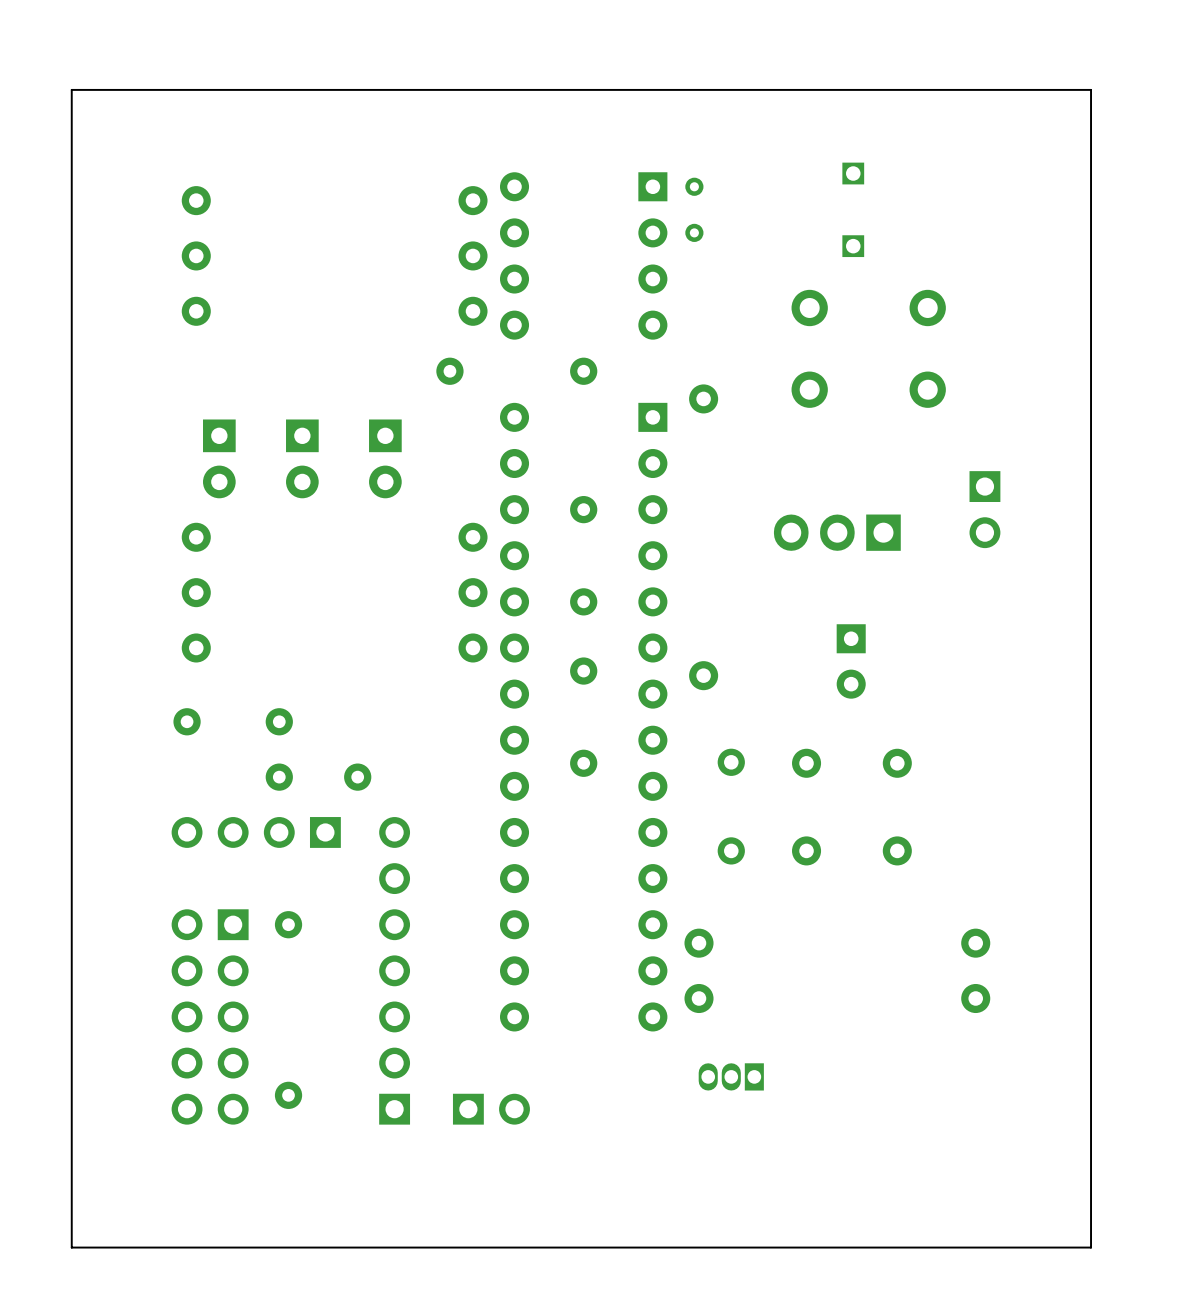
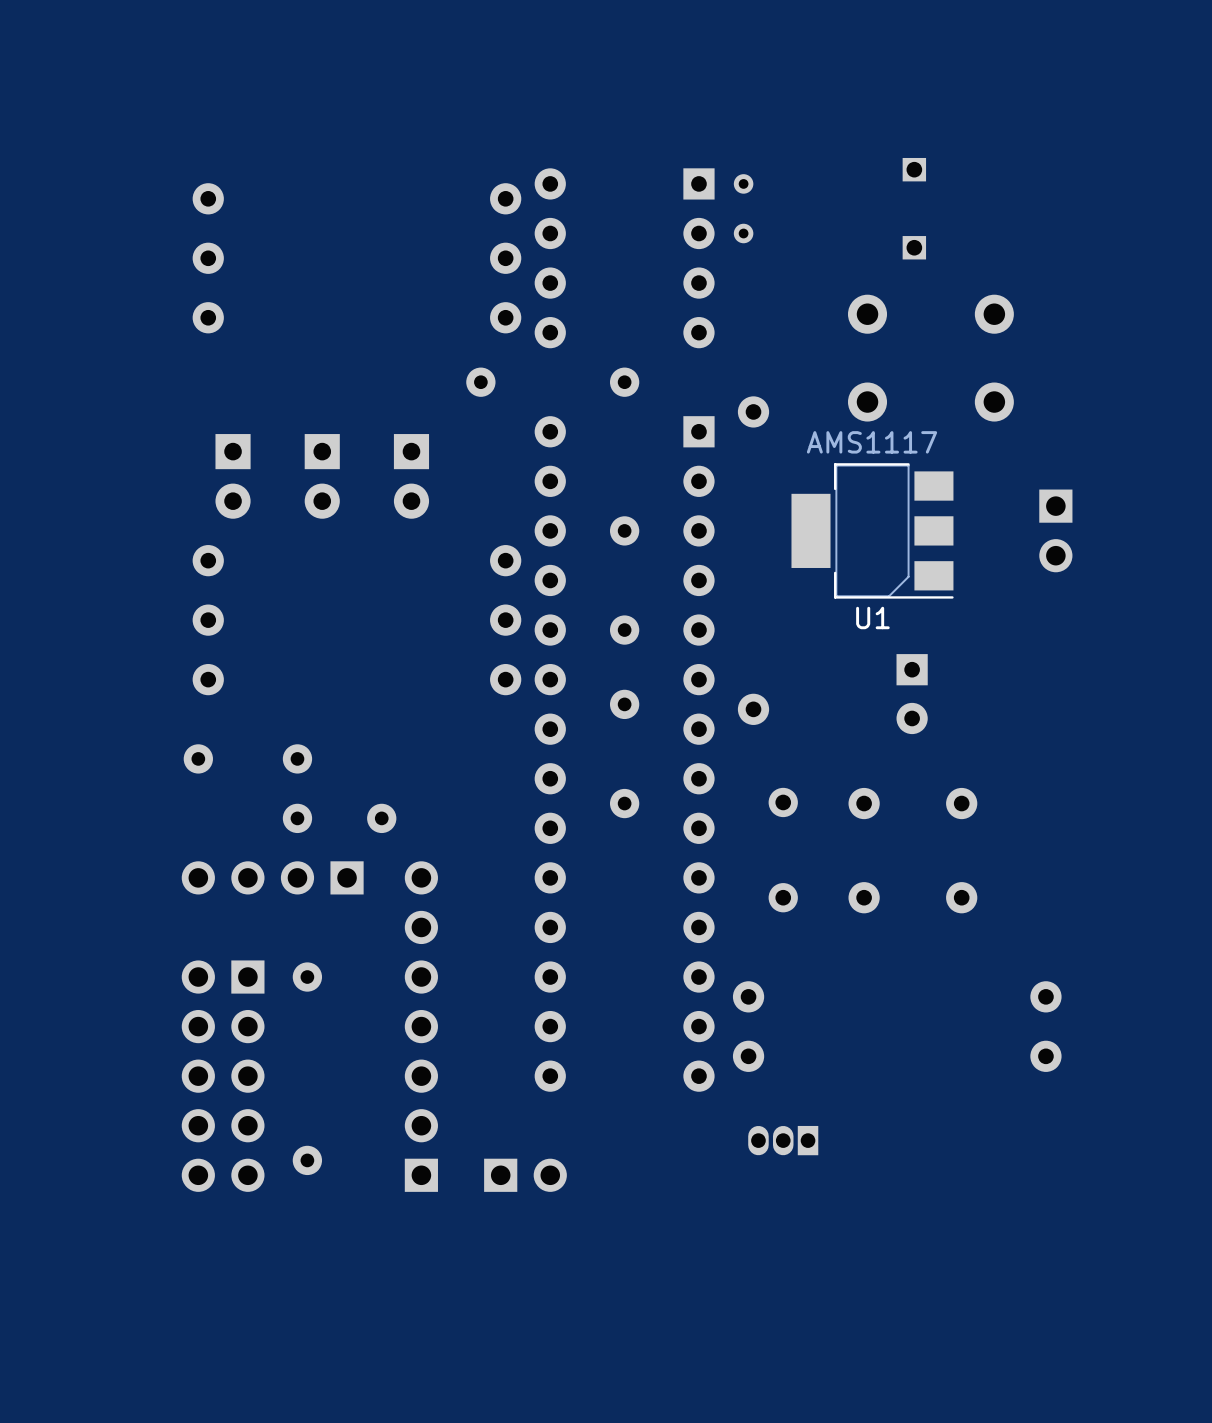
board edge: (1091, 89) (1091, 1247) (71, 1247) (71, 89) (1091, 89) -> none
U1: none -> AMS1117 (872, 530)
part: (837, 532) -> none

